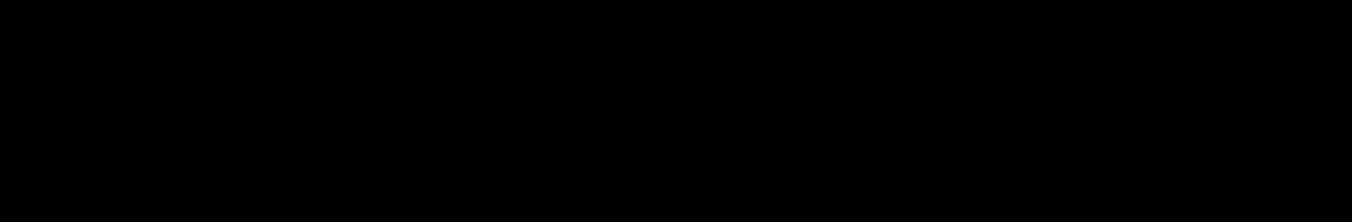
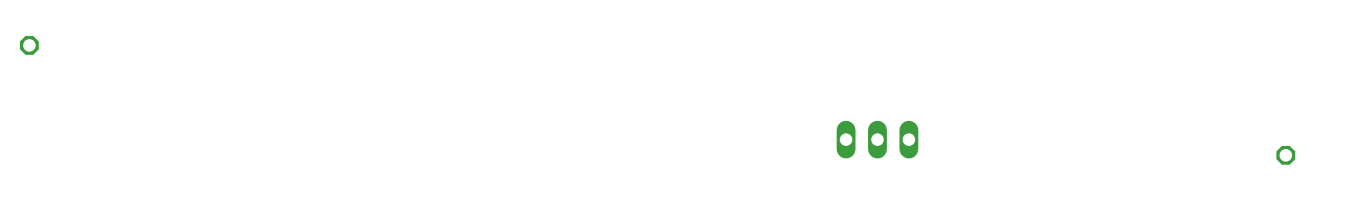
part: none -> (29, 45)
part: none -> (877, 139)
part: none -> (1285, 155)

